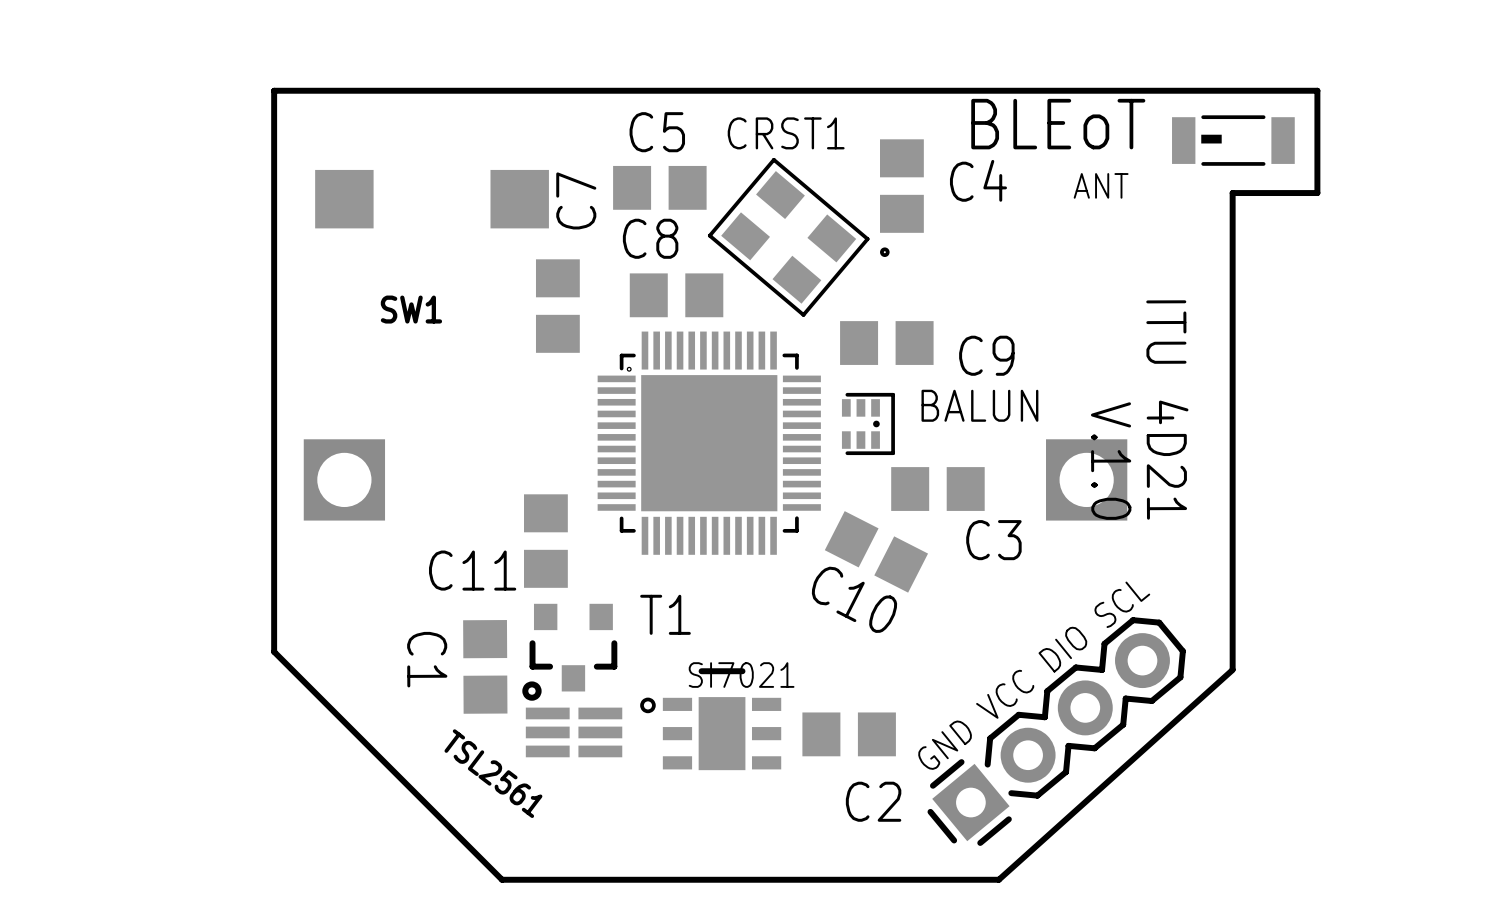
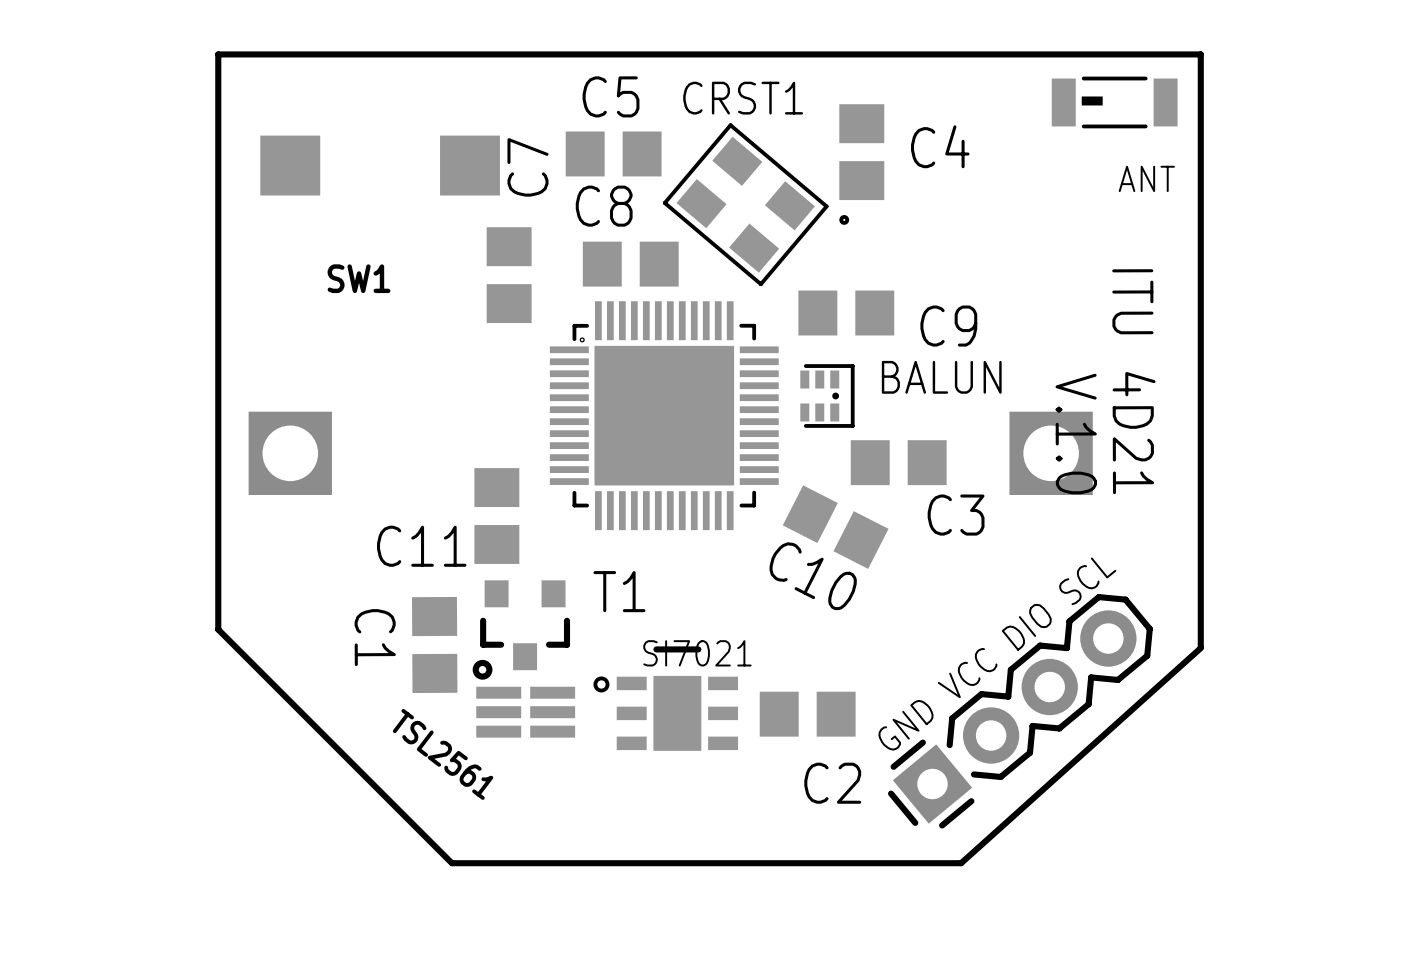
board edge: (1232, 90) (1317, 90) (1317, 193) (1232, 193) -> (1200, 54) (1200, 159)
text: BLEoT (1058, 124) -> none
ANT position: (1233, 140) -> (1114, 102)
ANT name position: ANT (1101, 185) -> ANT (1146, 178)

